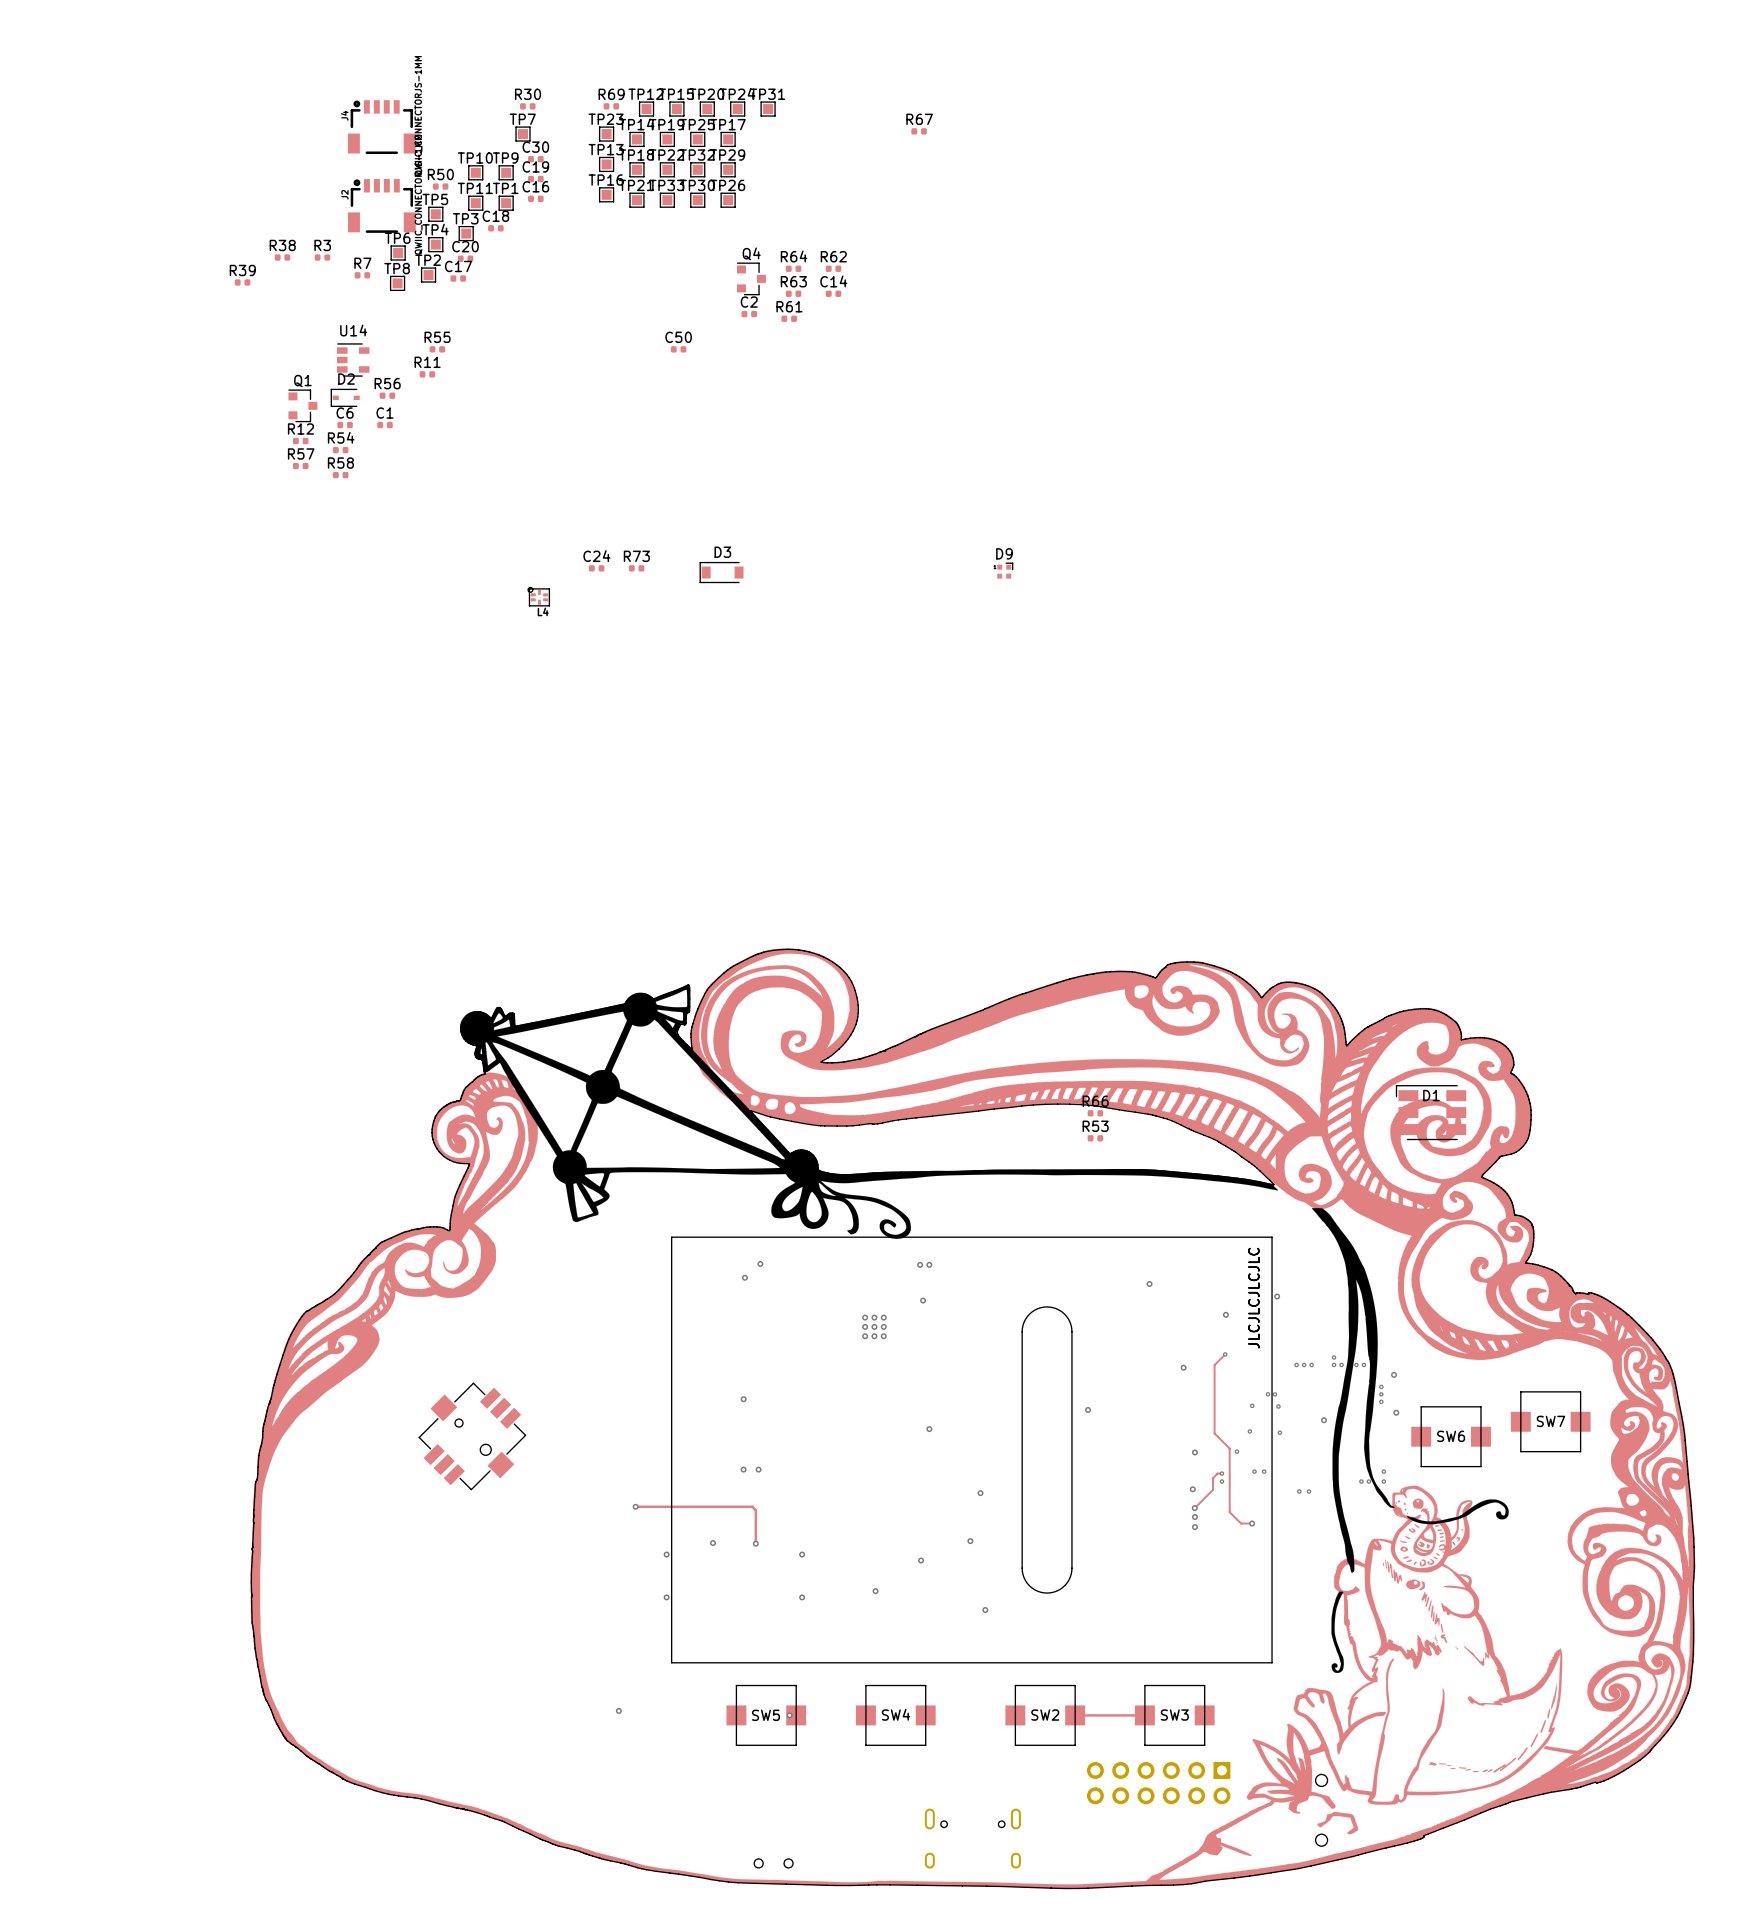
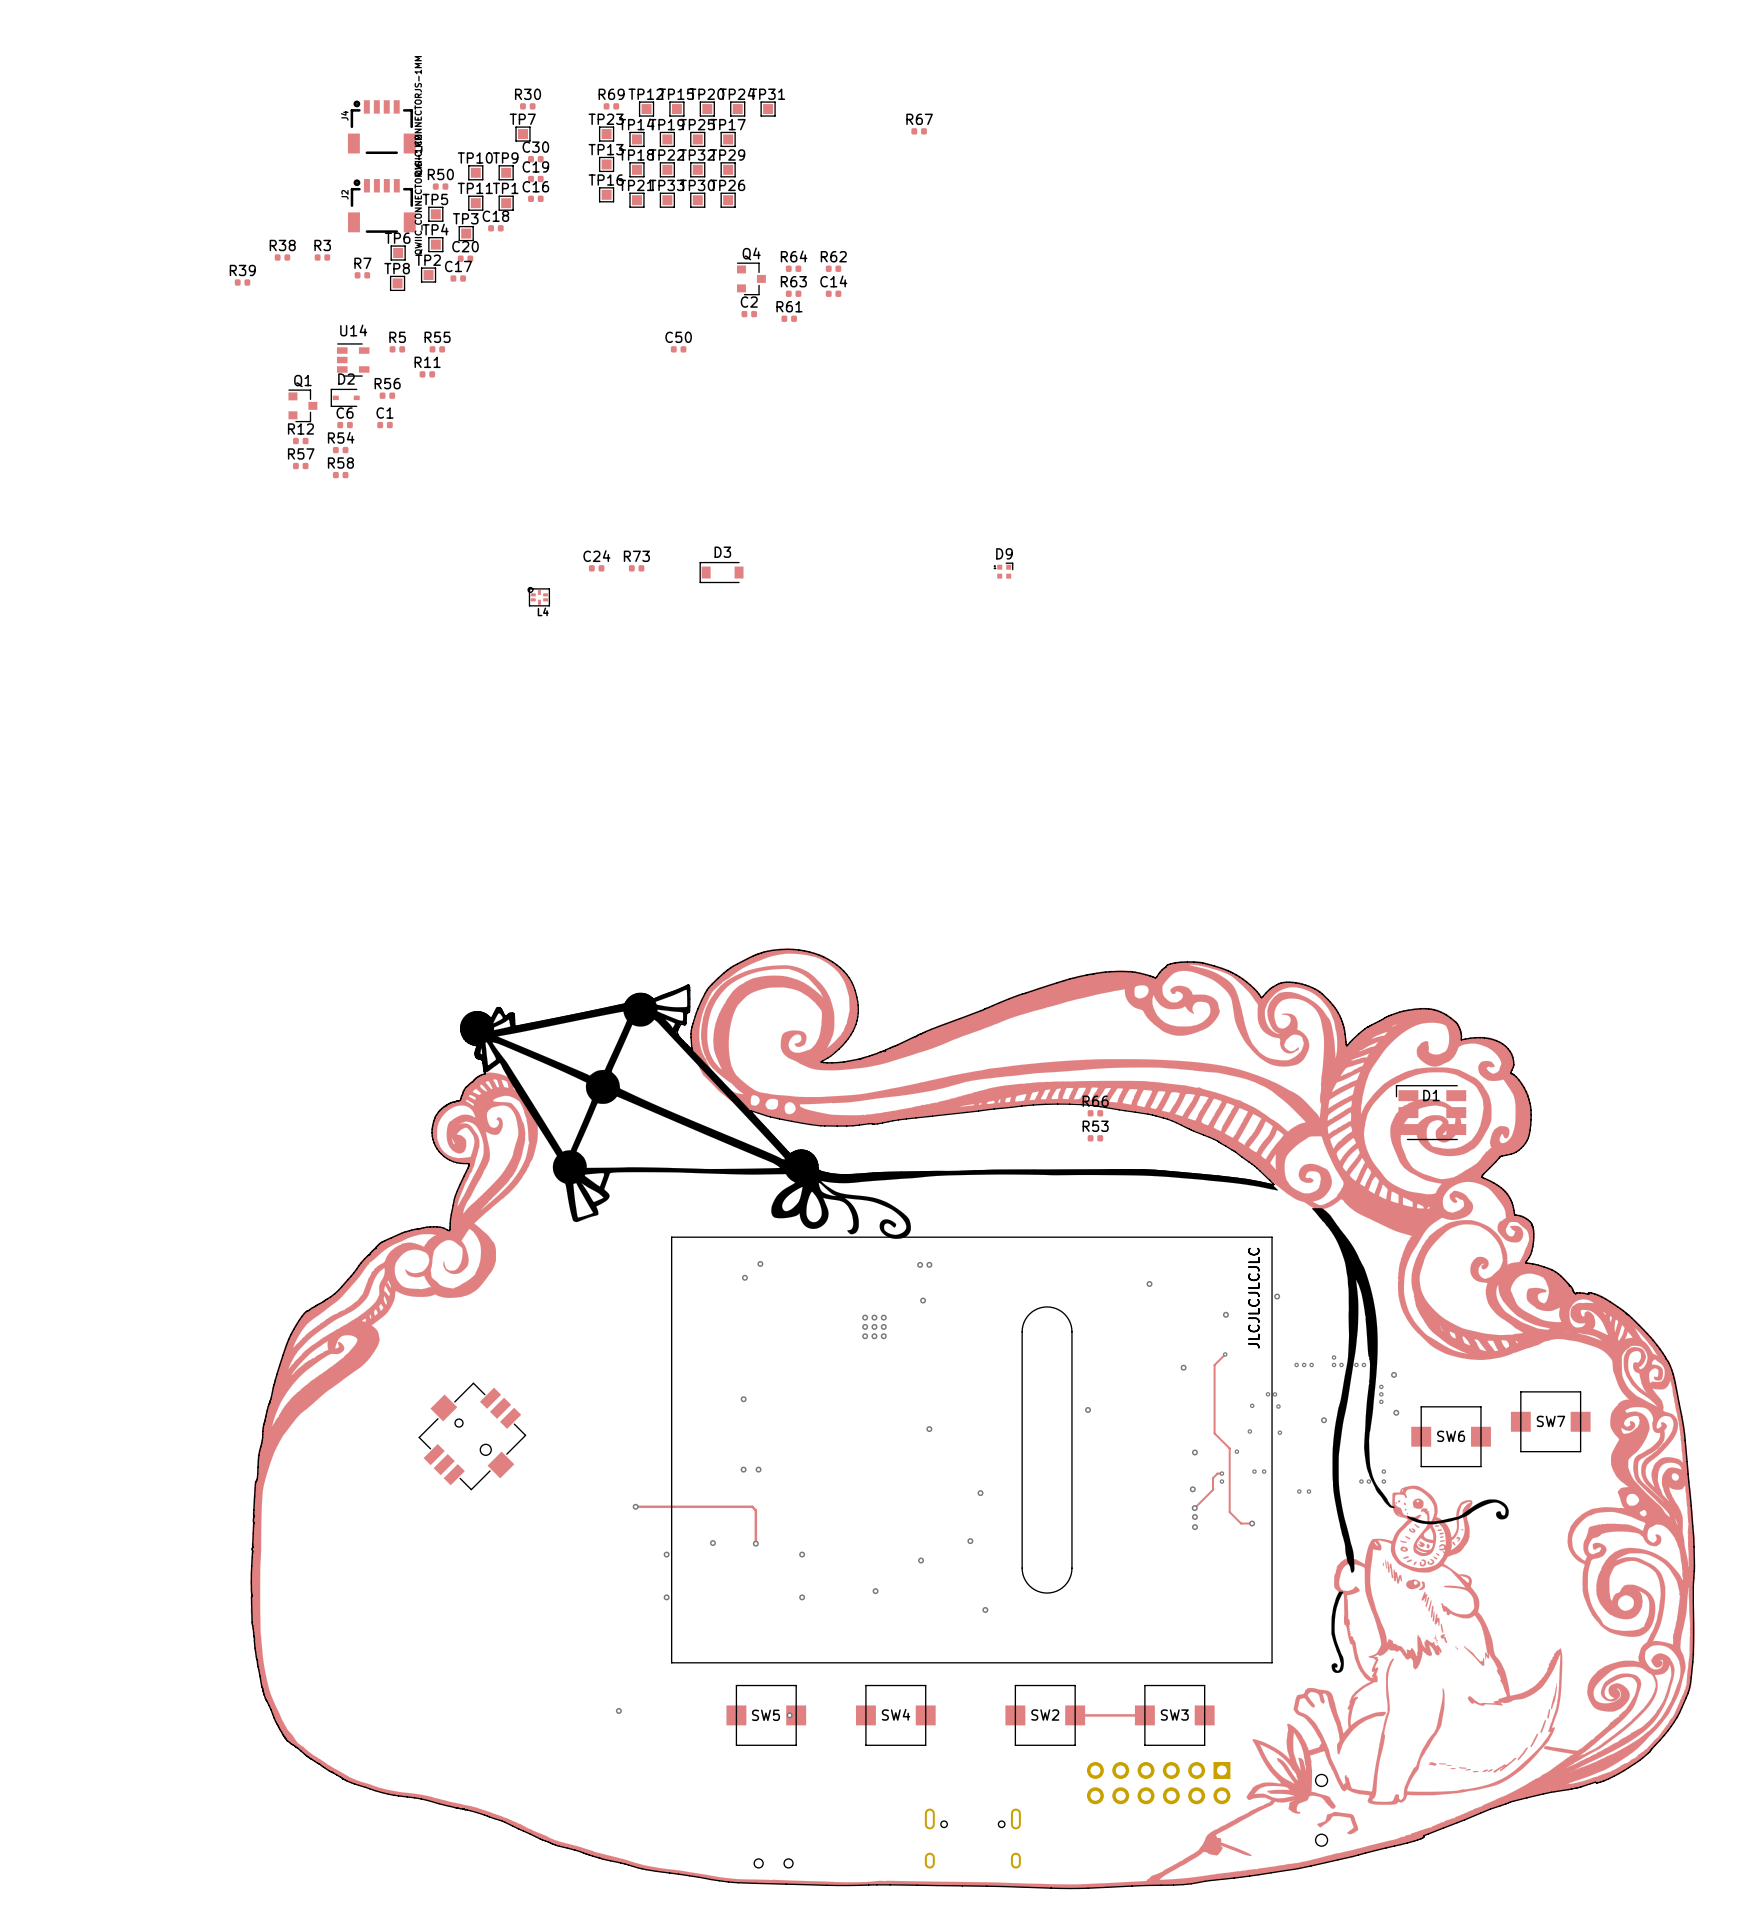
R5: none -> (397, 349)

